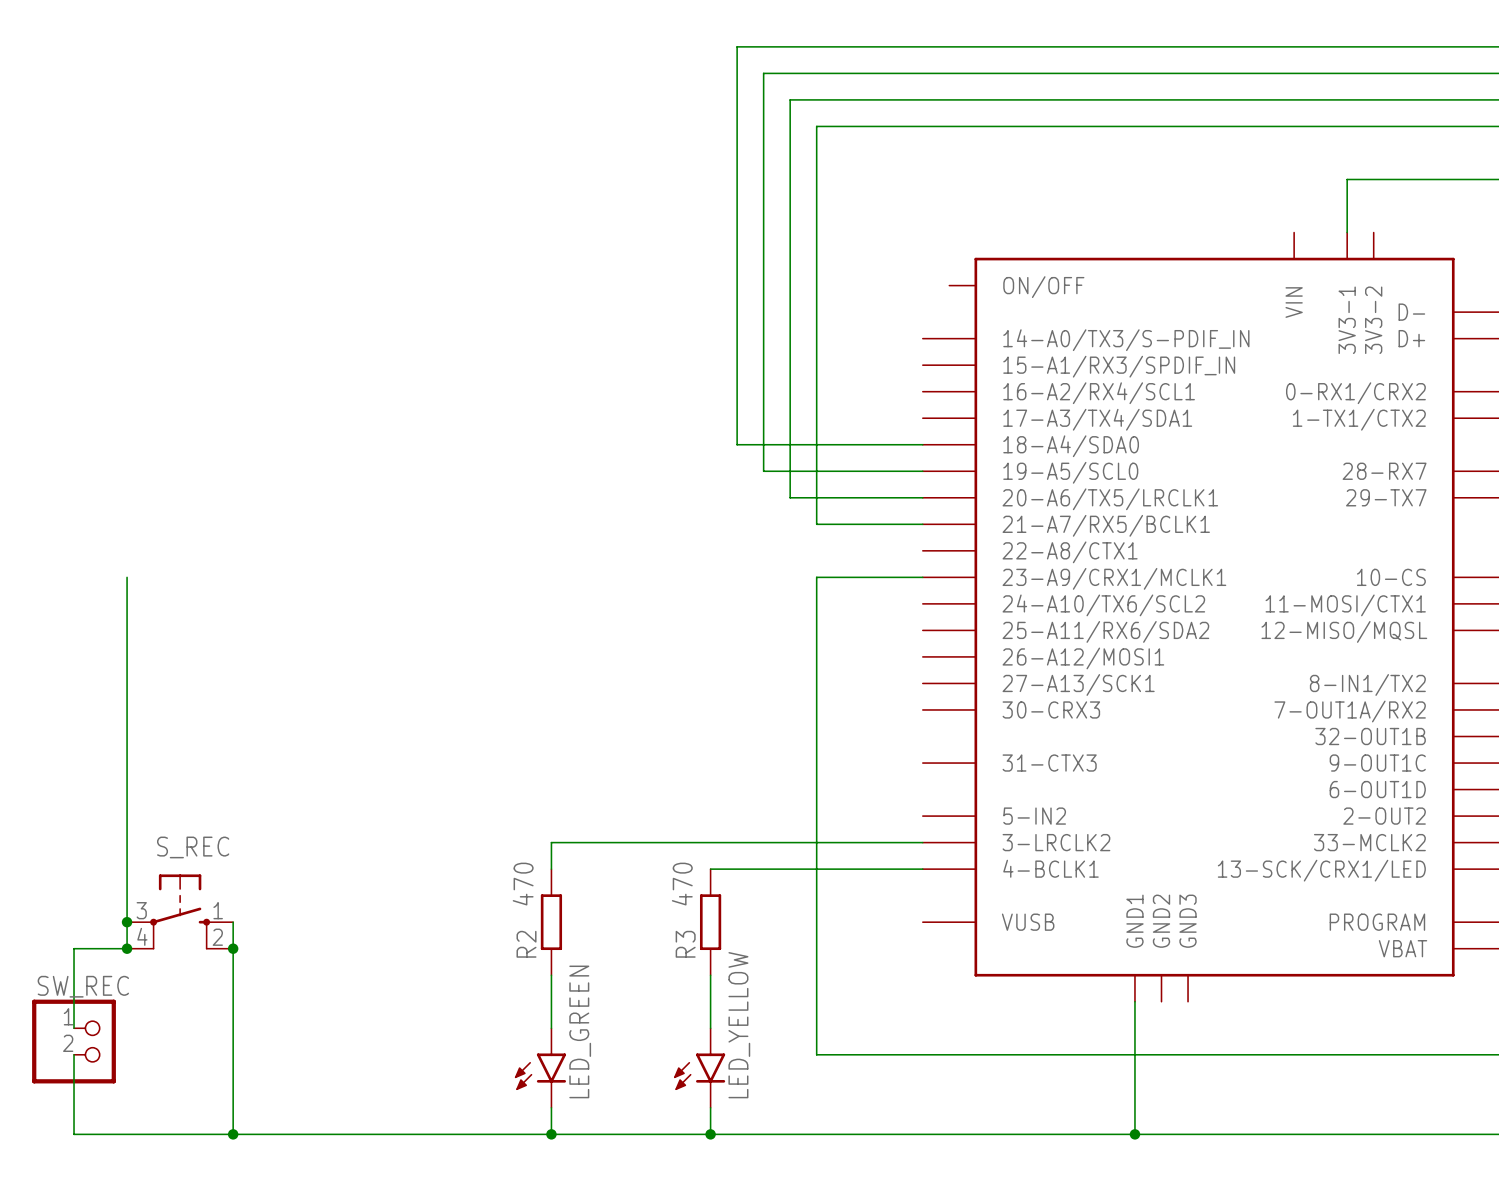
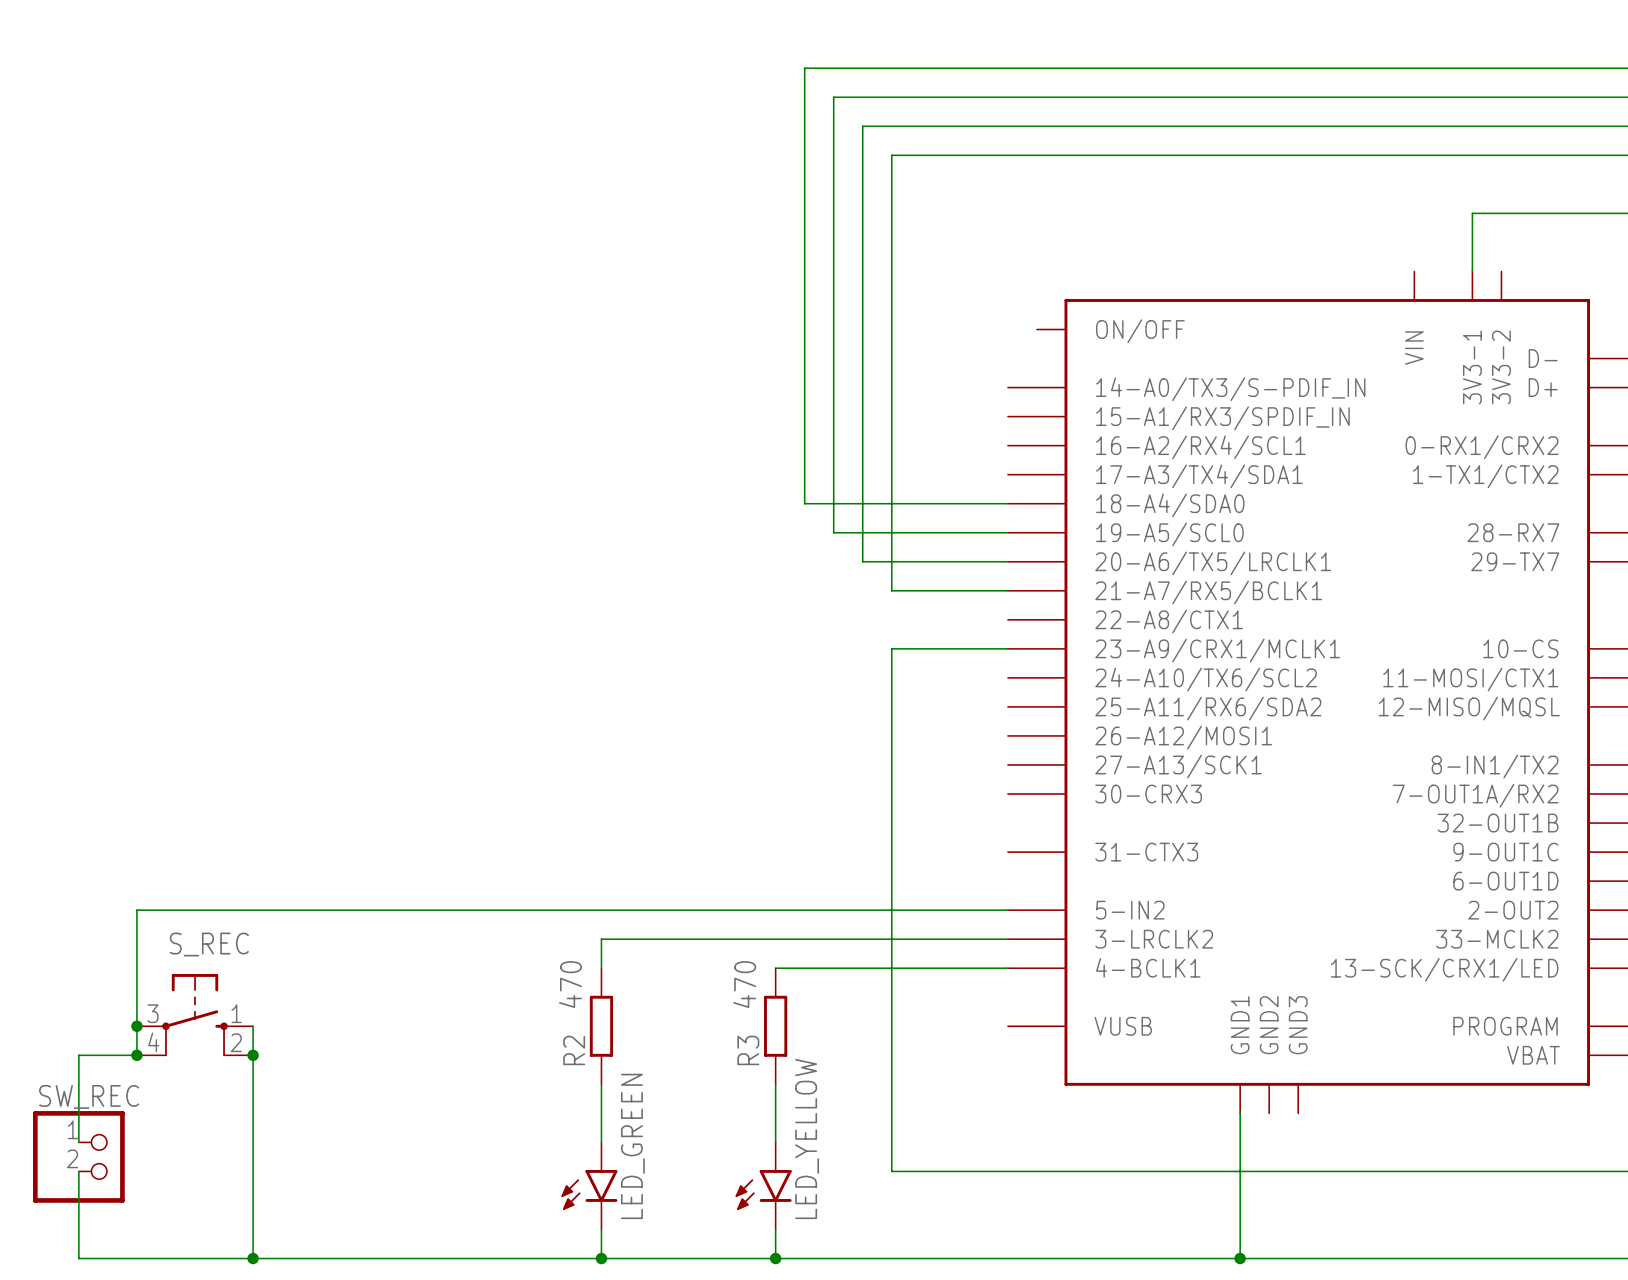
wire: (127, 577) (127, 816) -> (1007, 910) (136, 910)

